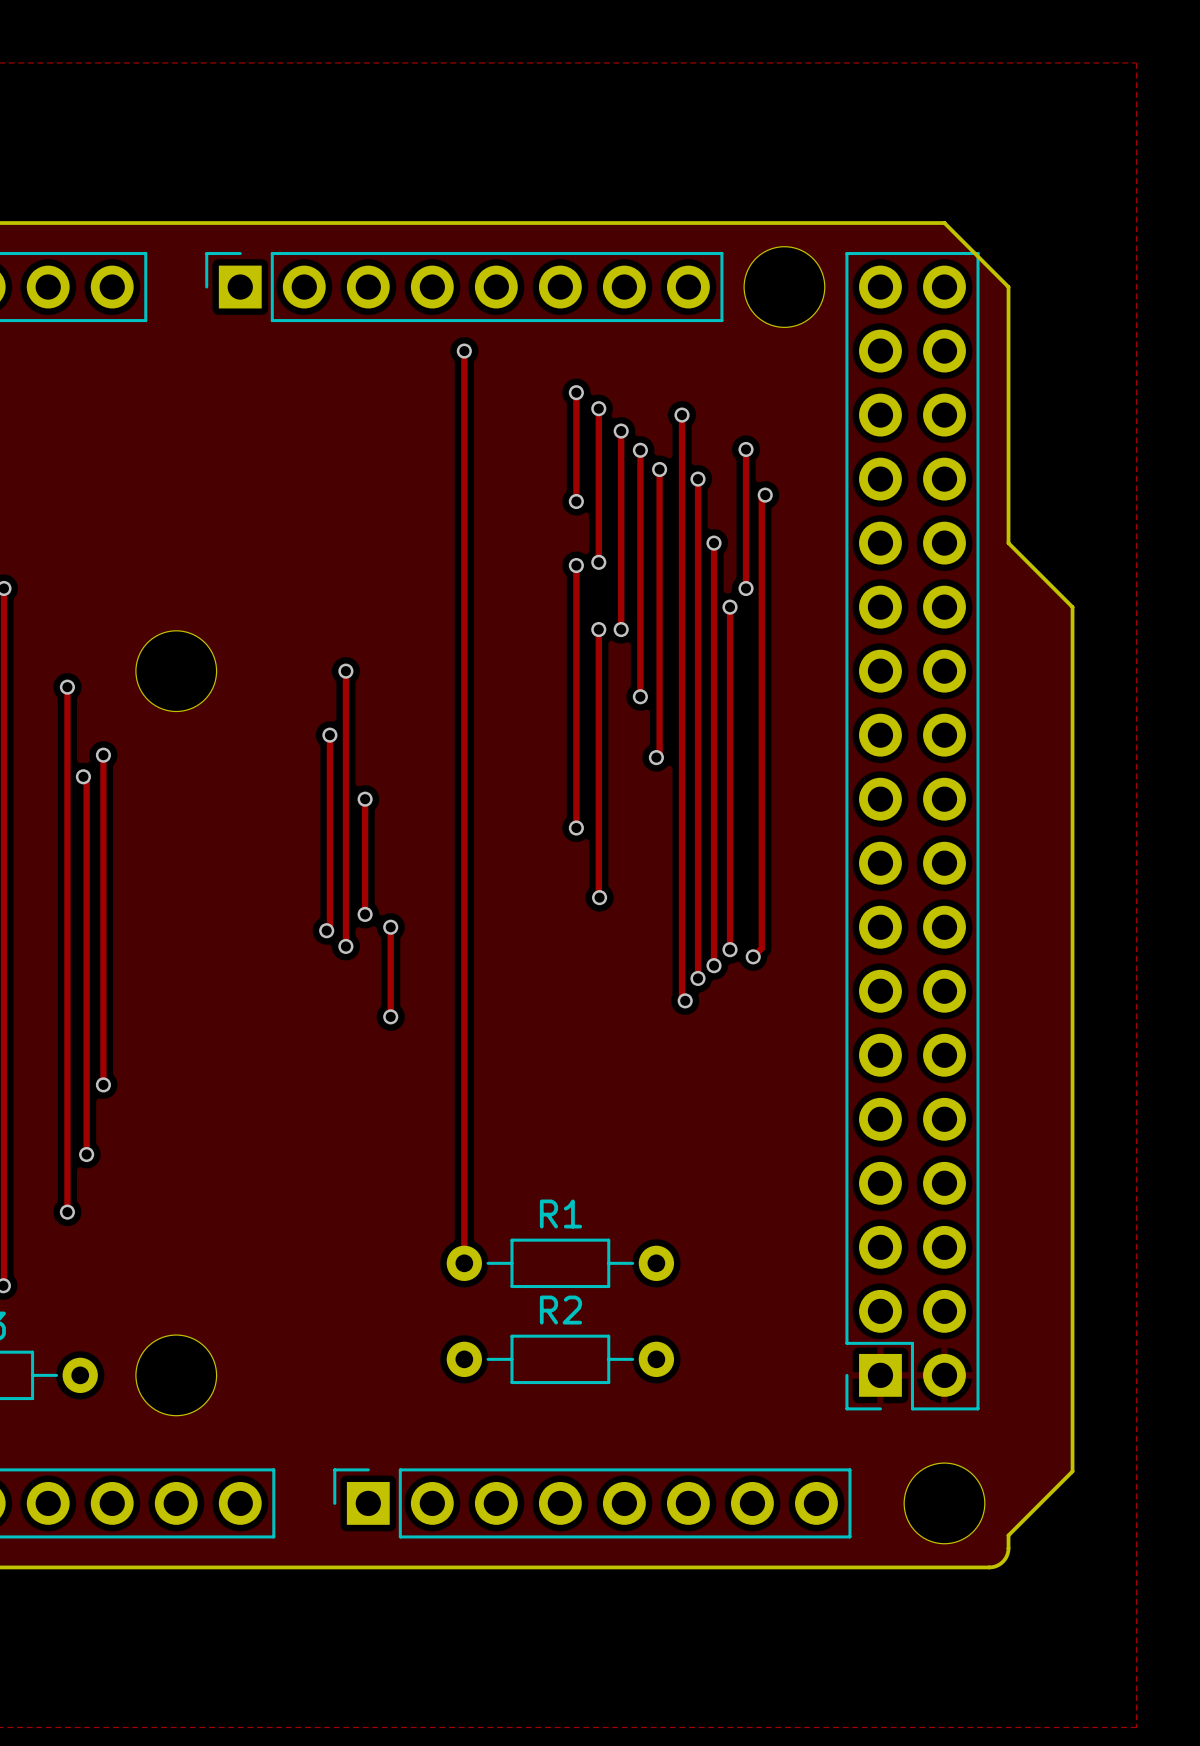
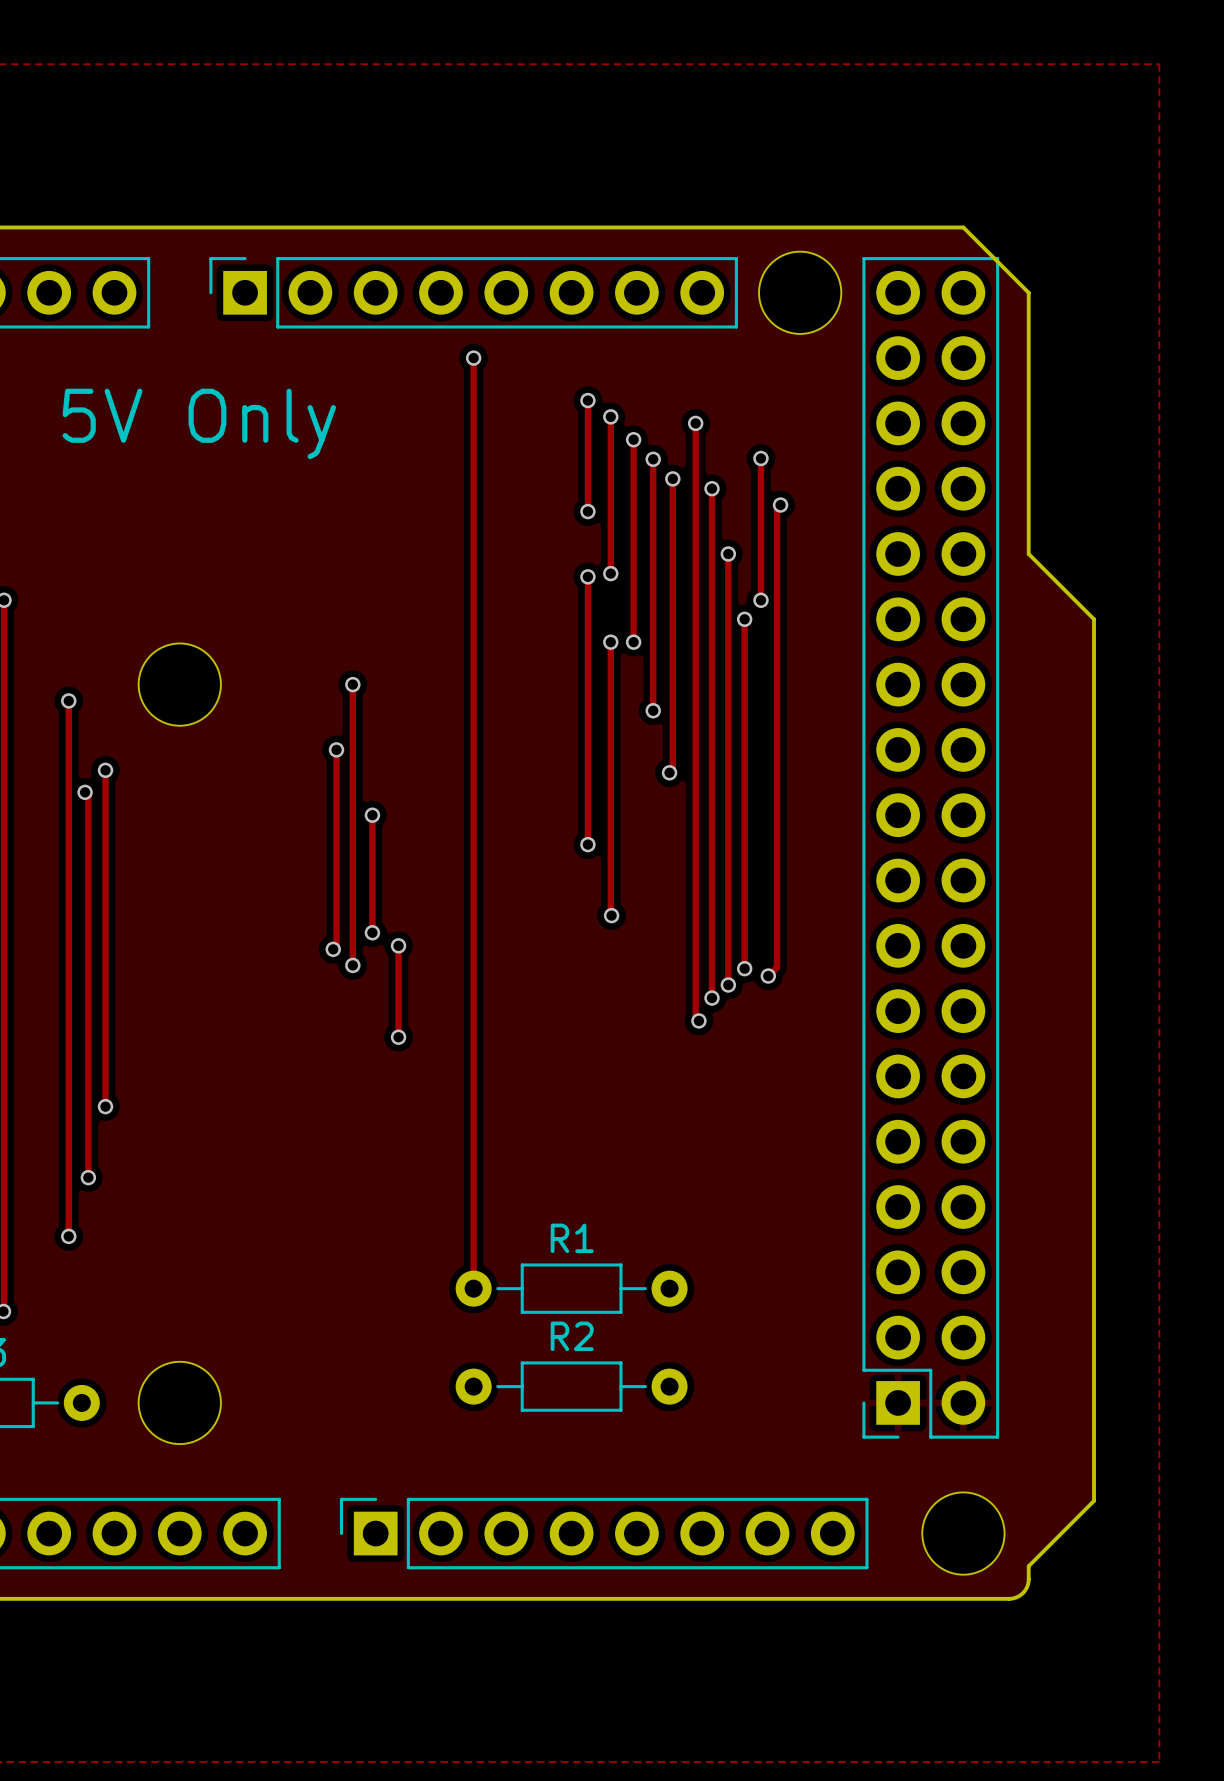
text: none -> 5V Only (199, 423)

